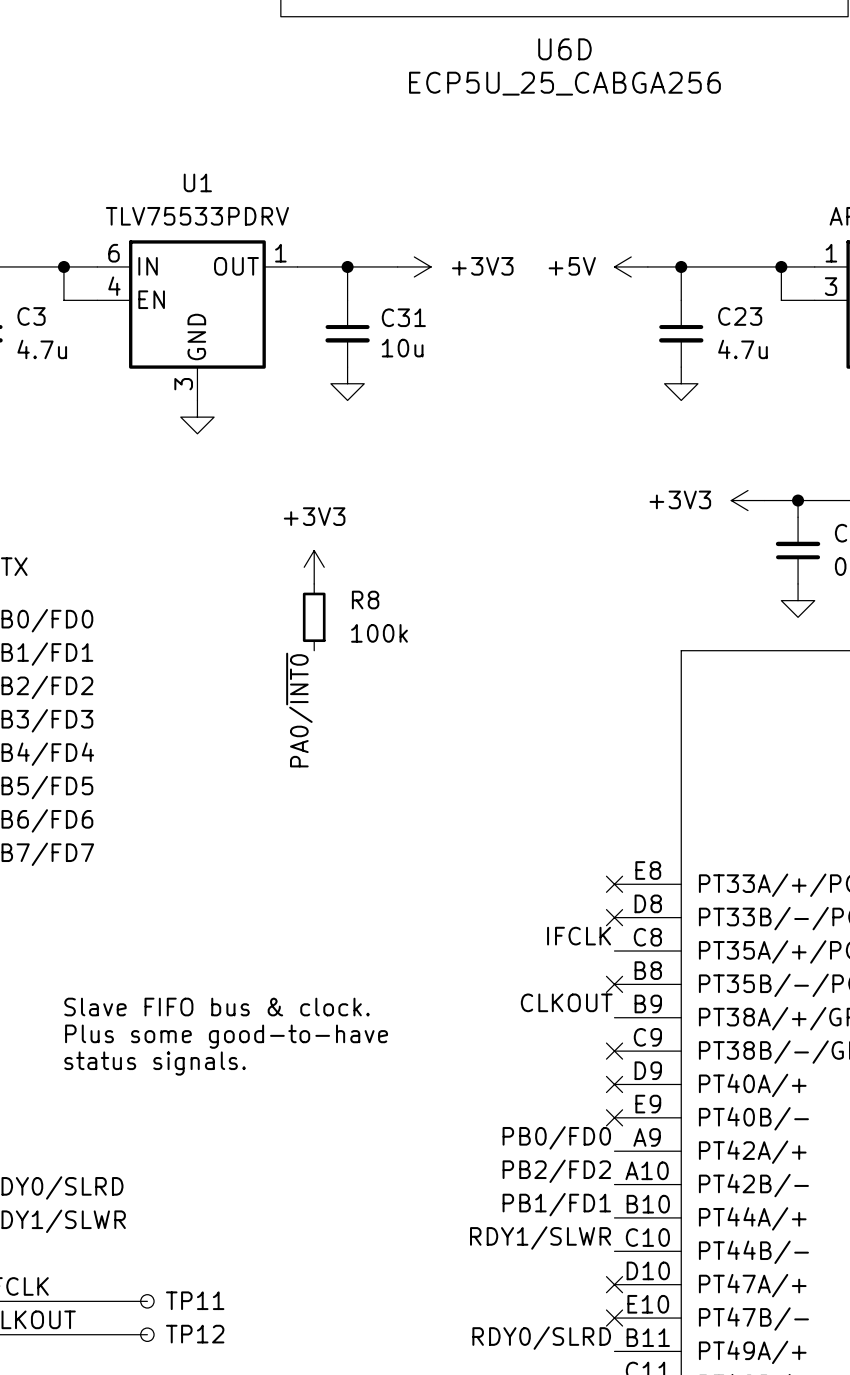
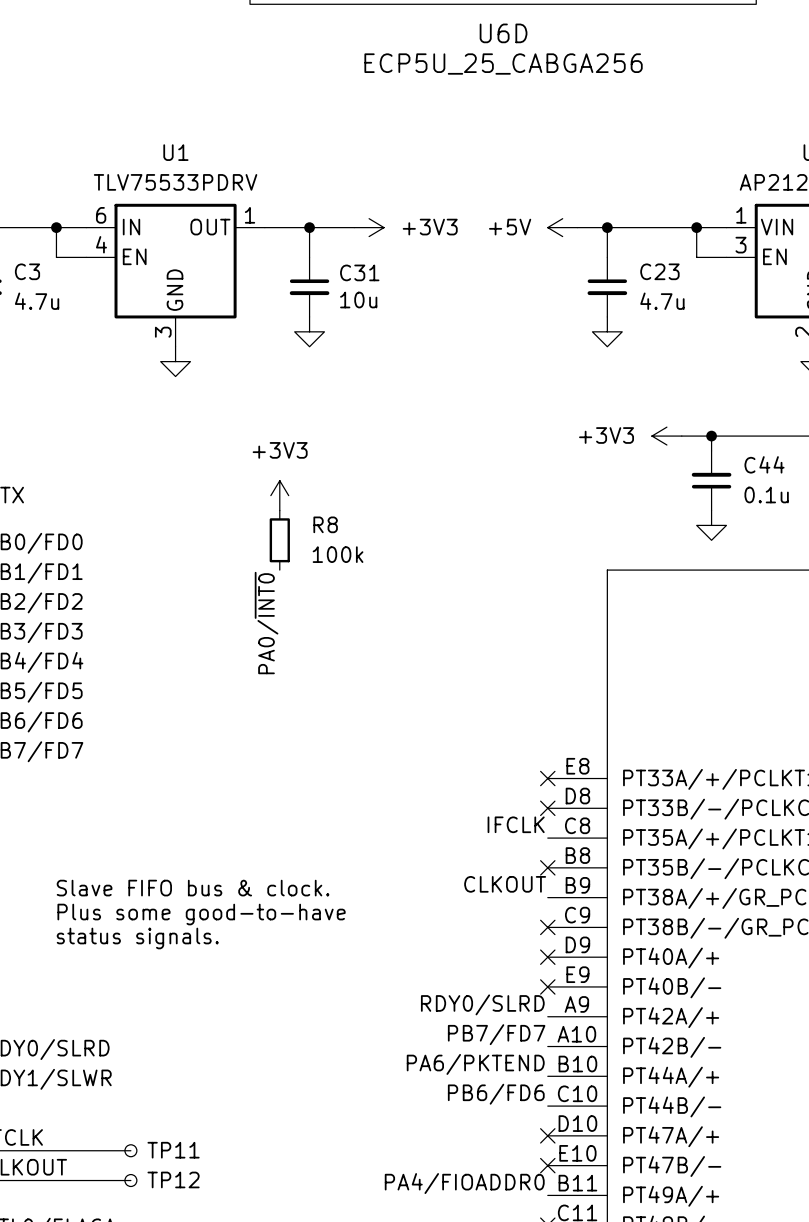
label: PB0/FD0 (556, 1137) -> RDY0/SLRD (482, 1004)
label: PB2/FD2 (556, 1171) -> PB7/FD7 (496, 1034)
label: PB1/FD1 (556, 1204) -> PA6/PKTEND (475, 1064)
label: RDY1/SLWR (540, 1238) -> PB6/FD6 (496, 1094)
label: RDY0/SLRD (541, 1338) -> PA4/FIOADDR0 (464, 1183)

